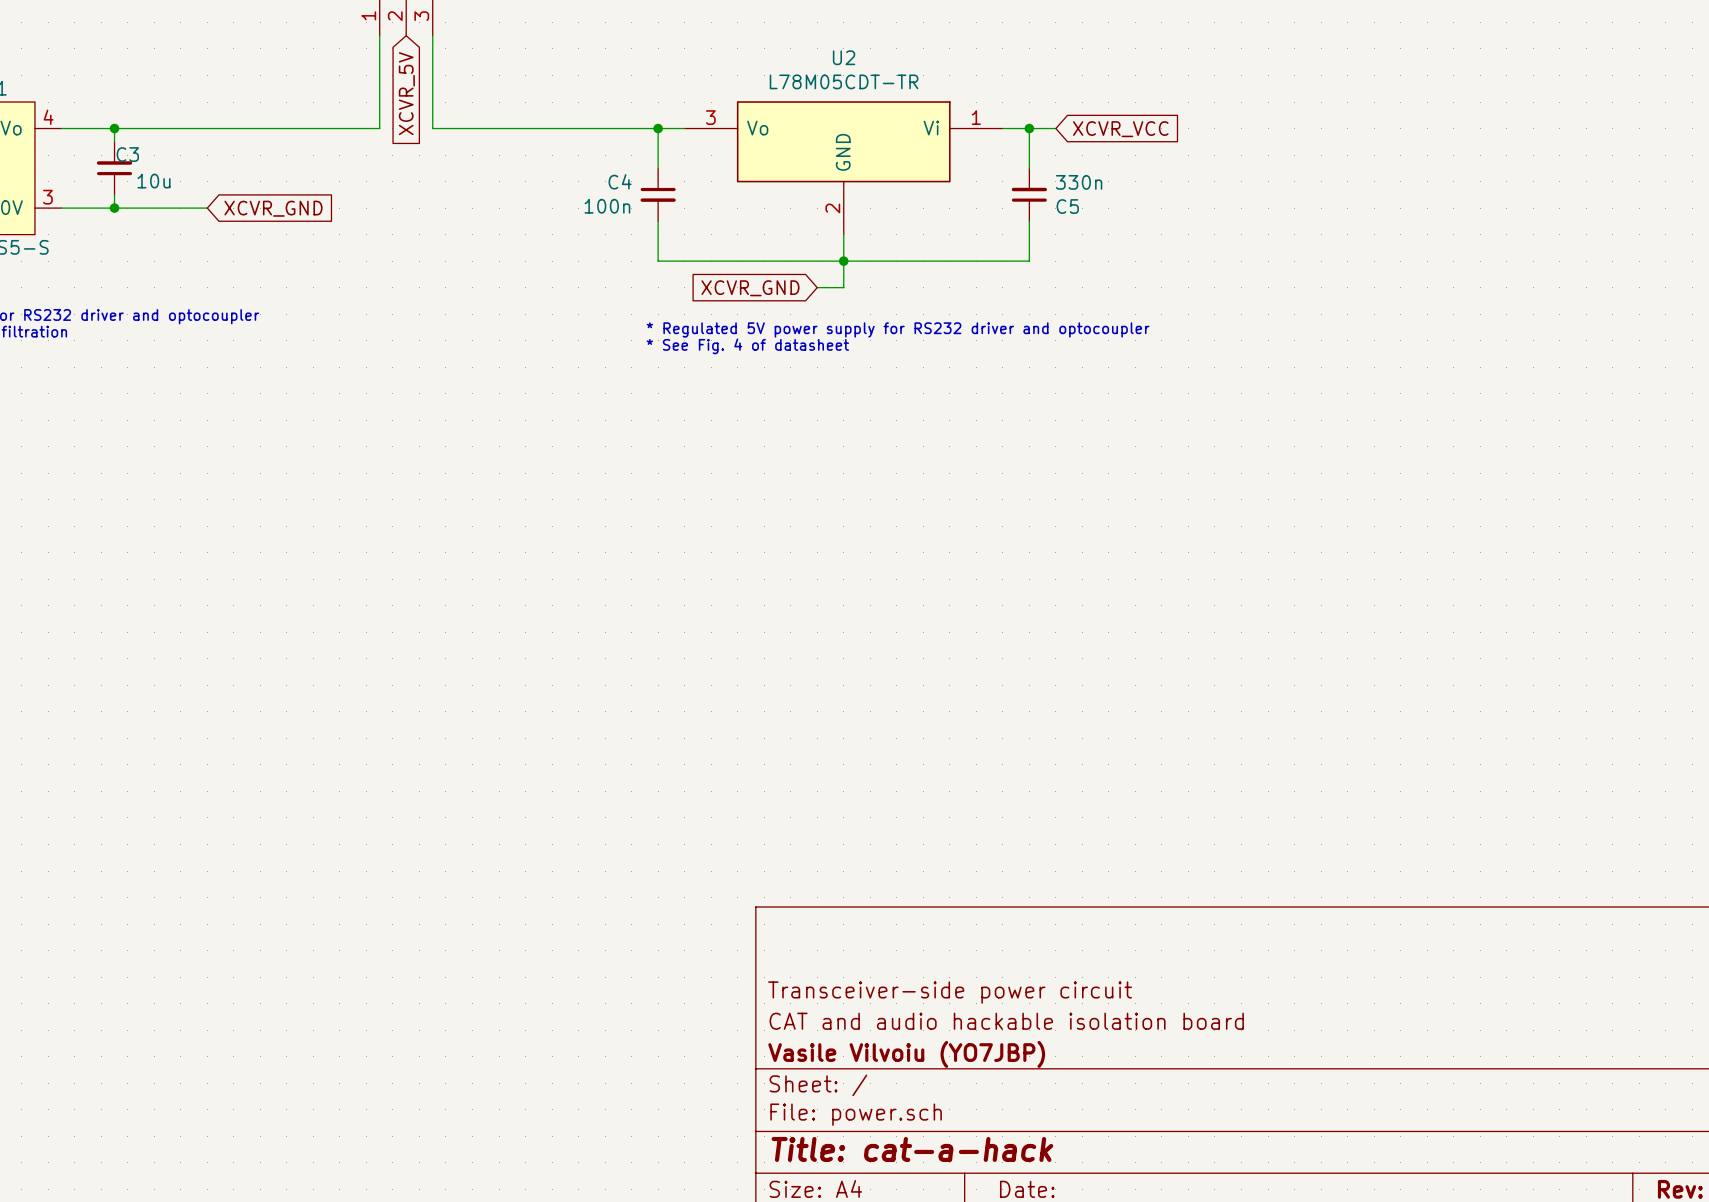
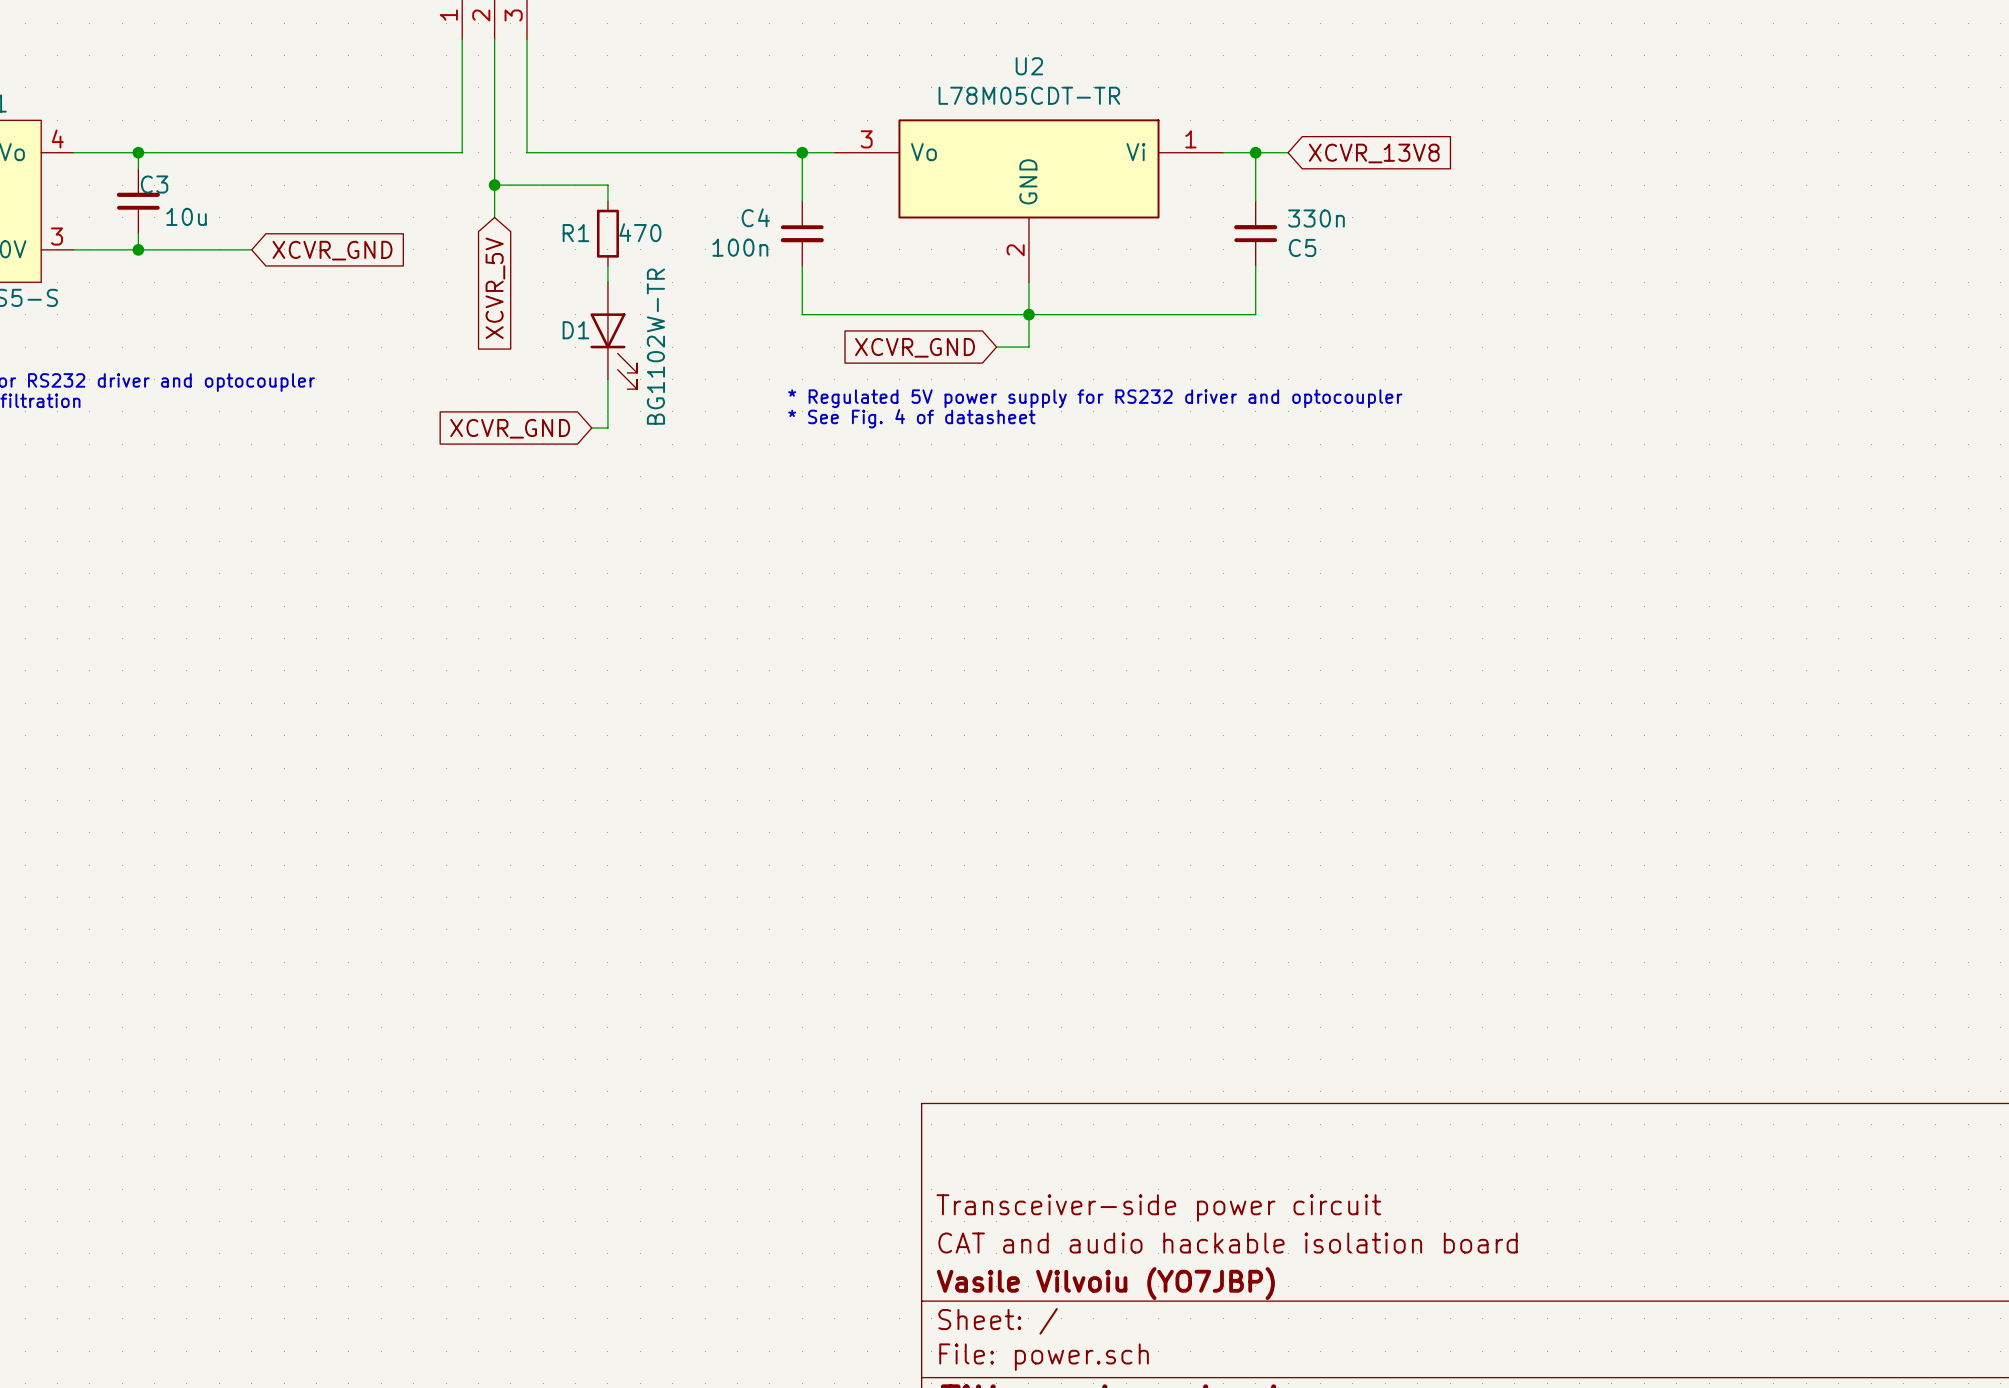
wire: none -> (494, 39) (494, 217)
global label position: XCVR_5V (406, 93) -> XCVR_5V (495, 288)
global label: XCVR_VCC (1120, 129) -> XCVR_13V8 (1374, 153)
wire: none -> (494, 185) (607, 185) (607, 201)
junction: none -> (494, 185)
R1: none -> 470 (607, 233)
wire: none -> (607, 266) (607, 282)
D1: none -> BG1102W-TR (613, 335)
wire: none -> (607, 379) (607, 428) (591, 428)
global label: none -> XCVR_GND (510, 428)

